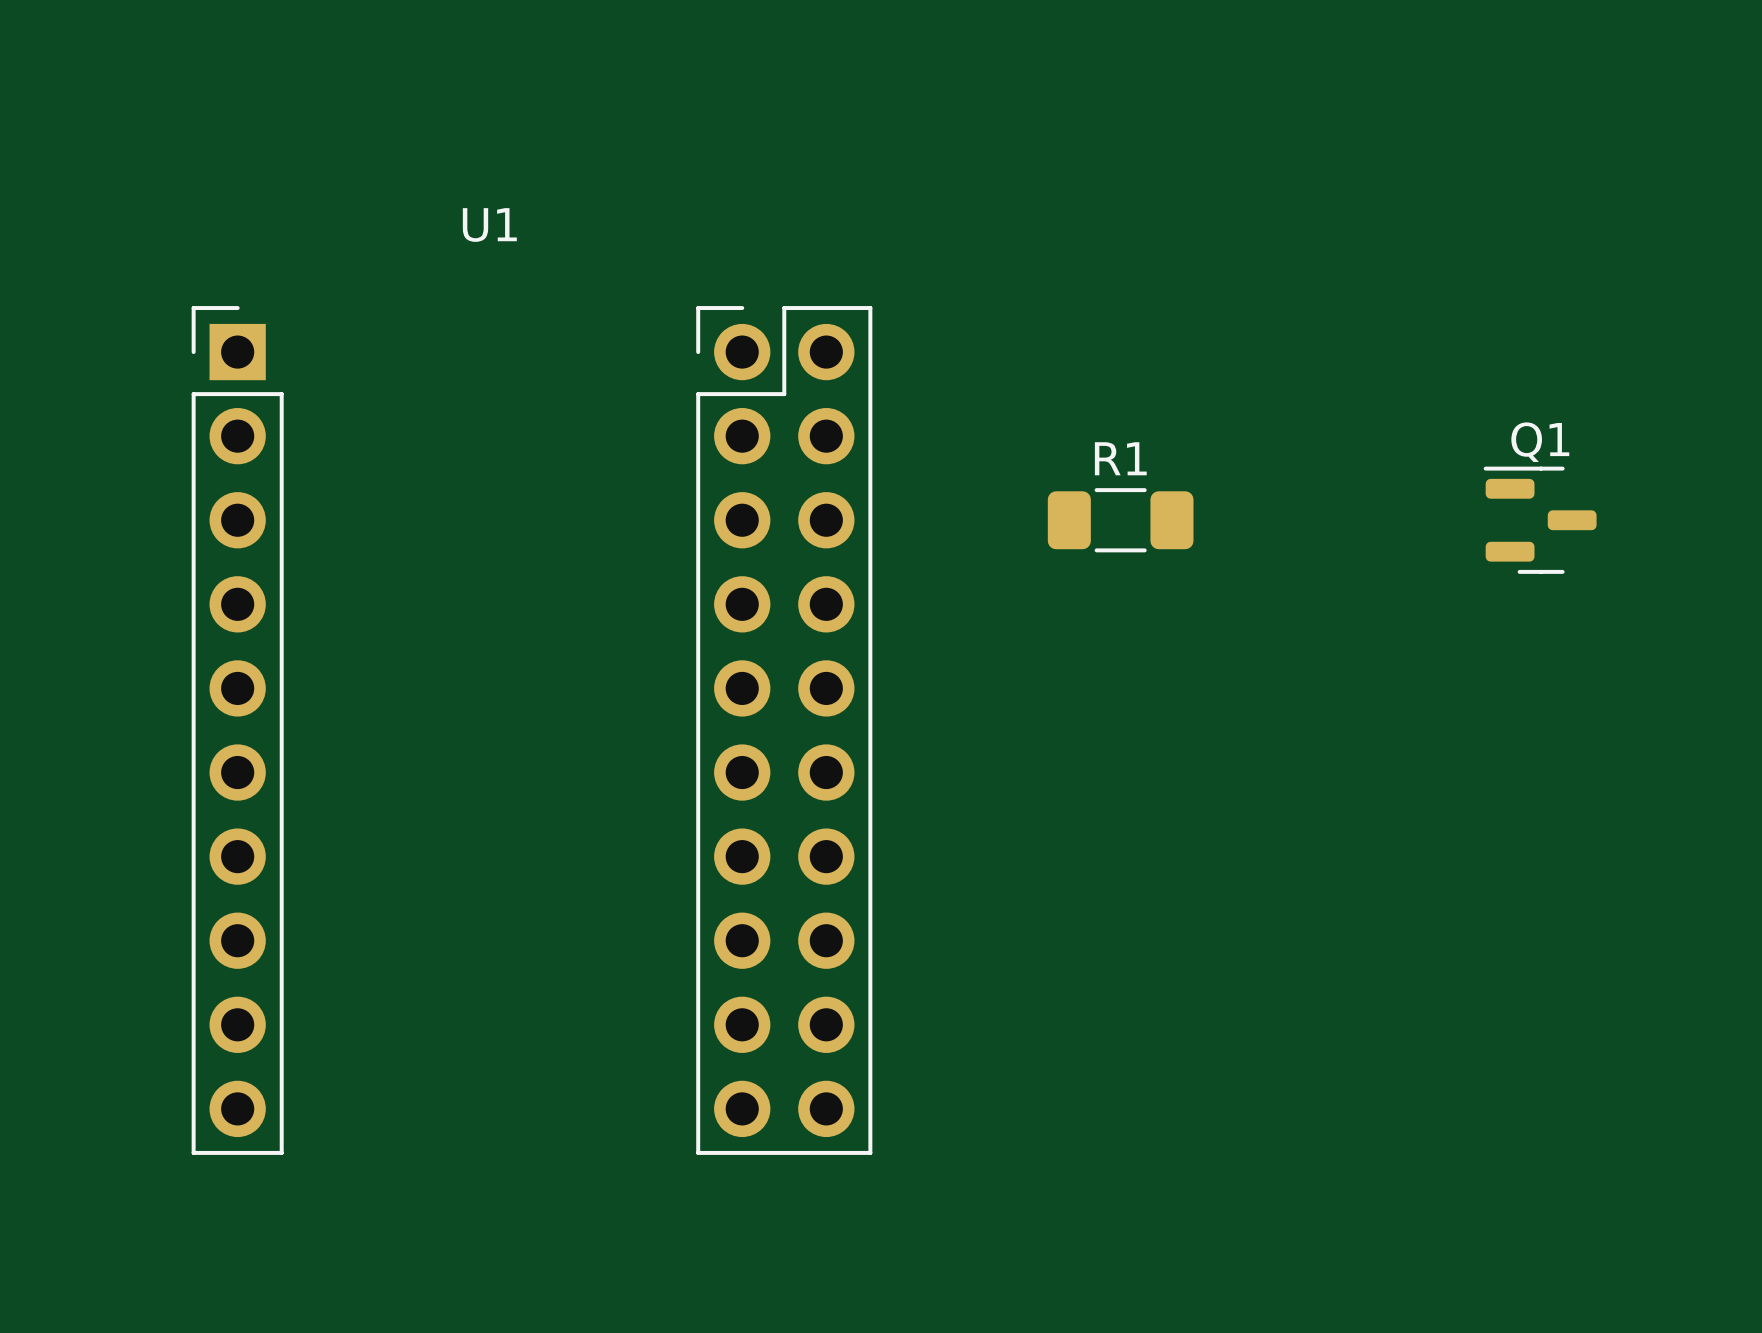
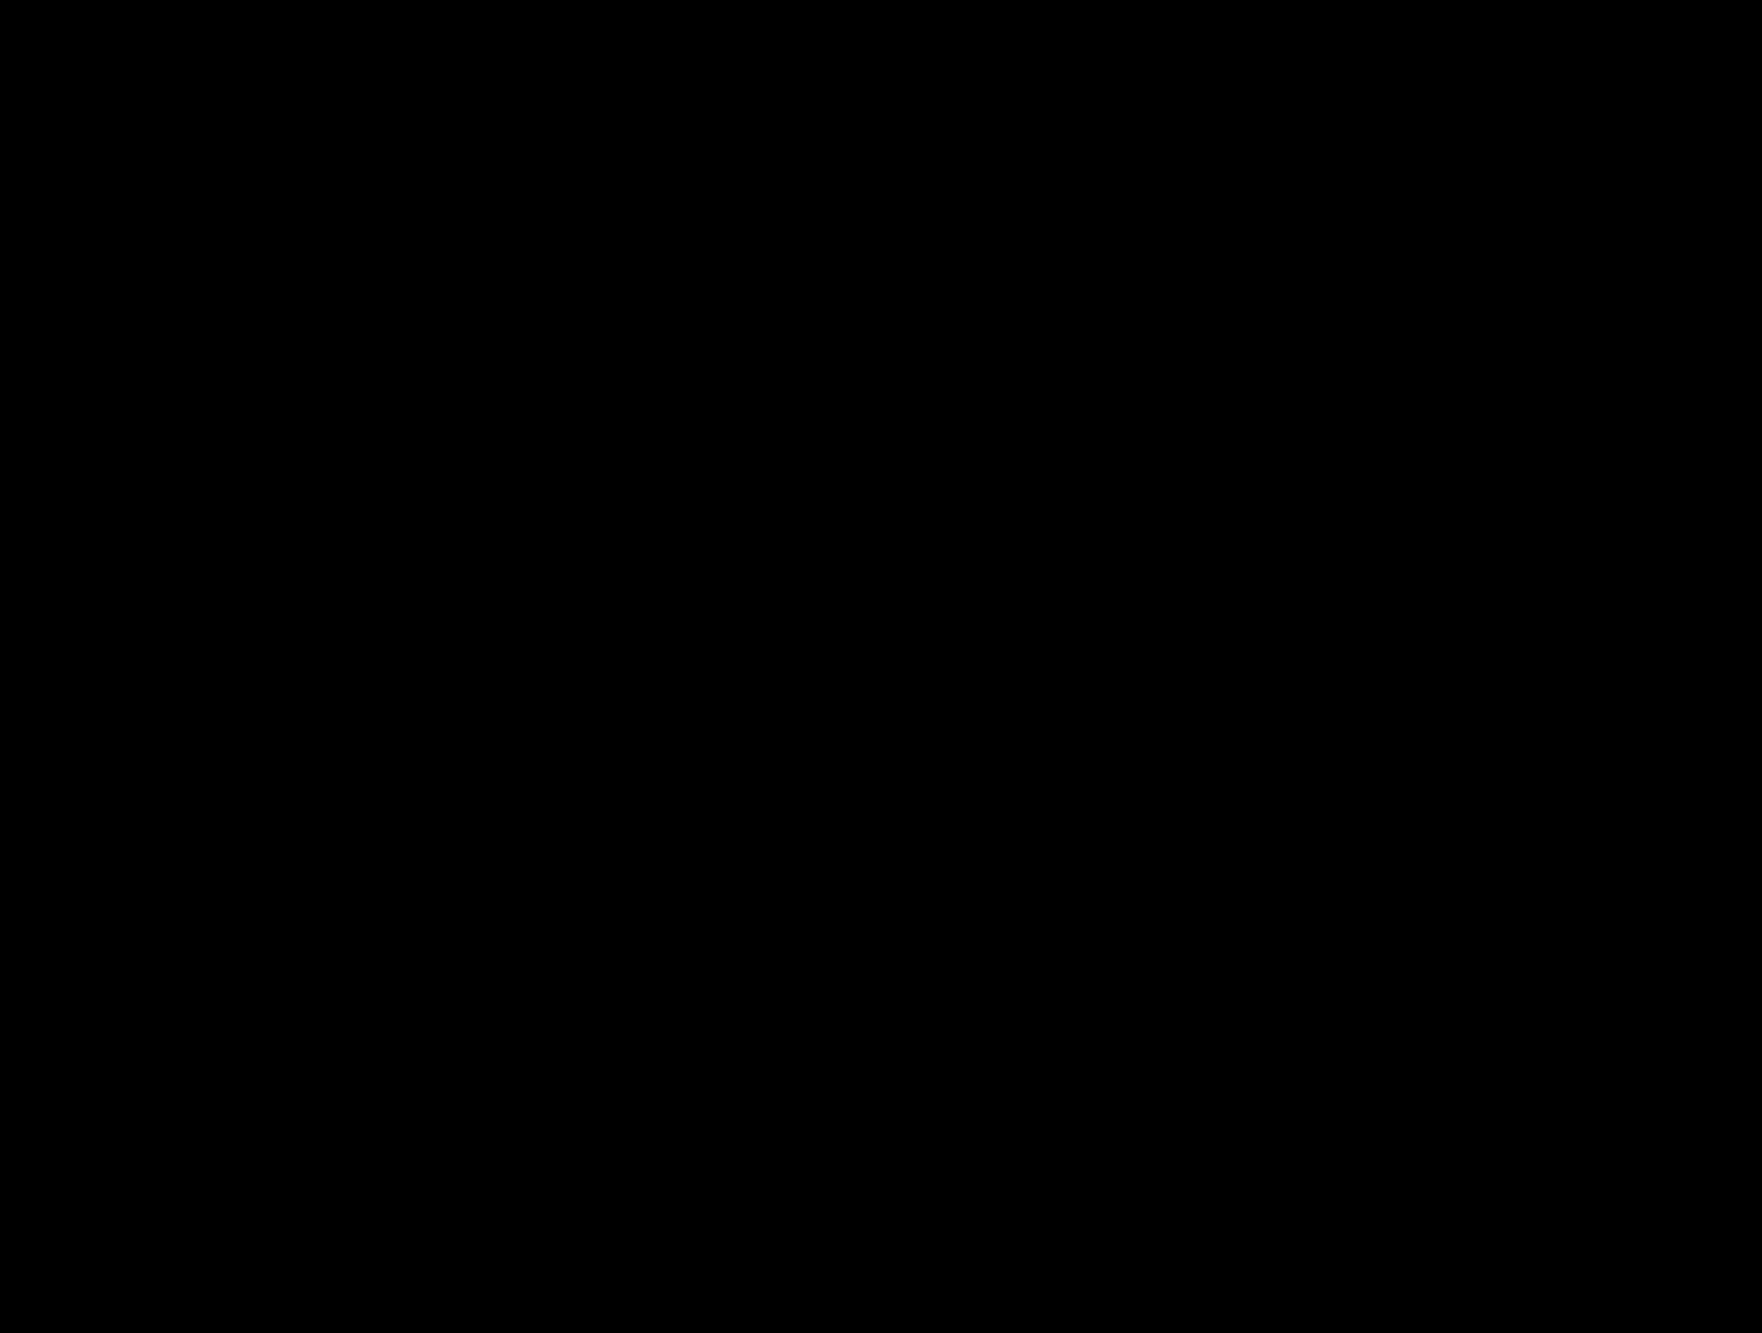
R1: (1120, 520) -> none
Q1: (1540, 520) -> none
U1: (532, 730) -> none

